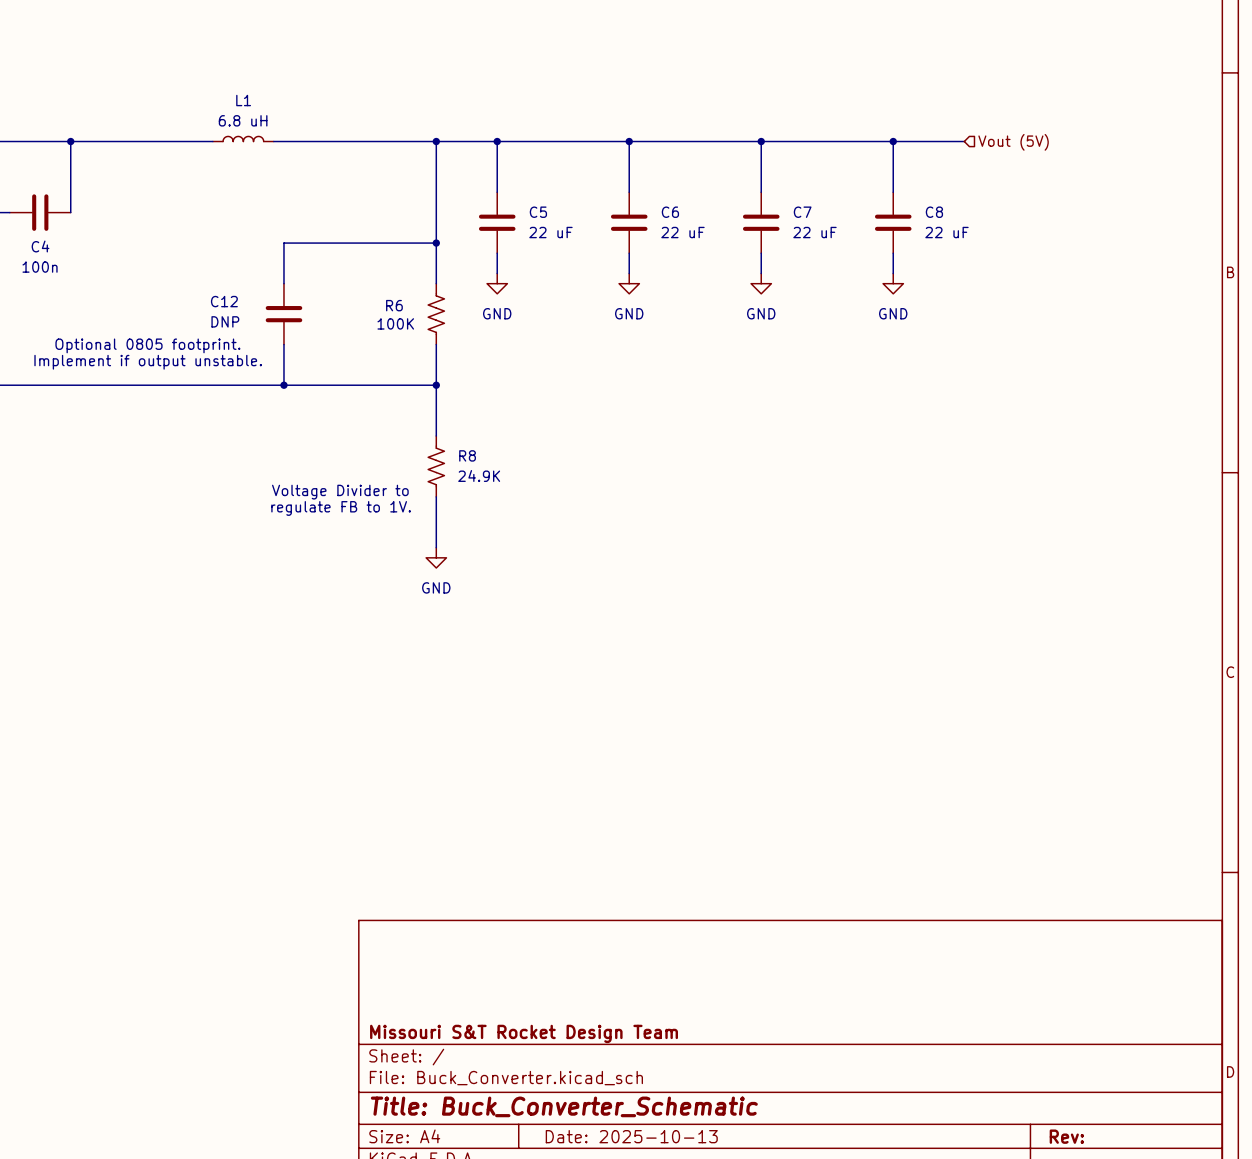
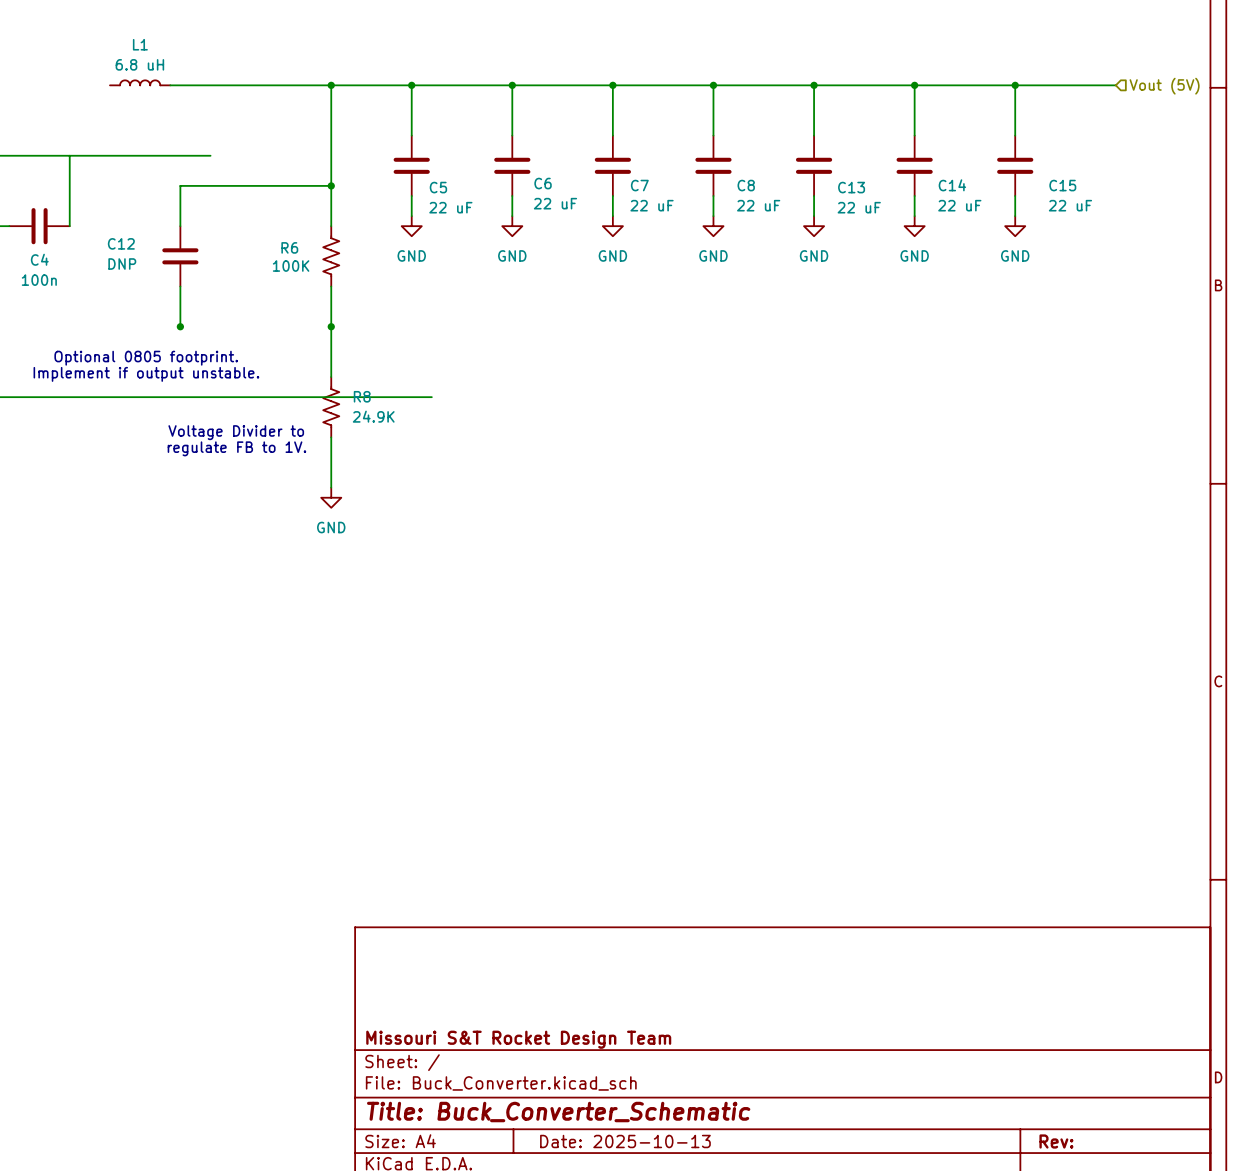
wire: none -> (170, 85) (1115, 85)
junction: none -> (331, 85)
wire: none -> (411, 85) (411, 135)
junction: none -> (411, 85)
junction: none -> (512, 85)
junction: none -> (612, 85)
junction: none -> (713, 85)
wire: none -> (814, 85) (814, 135)
junction: none -> (814, 85)
junction: none -> (914, 85)
wire: none -> (1015, 85) (1015, 135)
junction: none -> (1015, 85)
L1 position: (243, 138) -> (140, 82)
junction: (70, 141) -> none
wire: (273, 141) (964, 141) -> none
wire: (436, 141) (436, 283) -> (331, 85) (331, 226)
junction: (436, 141) -> none
wire: (497, 141) (497, 192) -> (512, 85) (512, 135)
junction: (497, 141) -> none
wire: (629, 141) (629, 192) -> (612, 85) (612, 135)
junction: (629, 141) -> none
wire: (761, 141) (761, 192) -> (713, 85) (713, 135)
junction: (761, 141) -> none
wire: (893, 141) (893, 192) -> (914, 85) (914, 135)
junction: (893, 141) -> none
hierarchical label position: Vout (5V) (1013, 142) -> Vout (5V) (1164, 86)
C13: none -> 22 uF (814, 165)
C14: none -> 22 uF (914, 165)
C15: none -> 22 uF (1015, 165)
junction: none -> (331, 185)
wire: none -> (411, 195) (411, 216)
wire: none -> (814, 195) (814, 216)
wire: none -> (1015, 195) (1015, 216)
power symbol: none -> GND (411, 226)
power symbol: none -> GND (512, 226)
C5 name position: C5 (538, 212) -> C5 (438, 187)
power symbol: none -> GND (612, 226)
C6 name position: C6 (670, 212) -> C6 (543, 183)
power symbol: none -> GND (713, 226)
C7 name position: C7 (802, 212) -> C7 (639, 185)
power symbol: none -> GND (814, 226)
power symbol: none -> GND (914, 226)
C8 name position: C8 (934, 212) -> C8 (746, 185)
power symbol: none -> GND (1015, 226)
C5 position: (497, 222) -> (411, 165)
C6 position: (629, 222) -> (512, 165)
C7 position: (761, 222) -> (612, 165)
C8 position: (893, 222) -> (713, 165)
C5 value position: 22 uF (550, 232) -> 22 uF (450, 207)
C6 value position: 22 uF (682, 232) -> 22 uF (555, 203)
C7 value position: 22 uF (814, 232) -> 22 uF (652, 205)
C8 value position: 22 uF (946, 232) -> 22 uF (758, 205)
wire: (436, 243) (283, 243) (283, 283) -> (331, 185) (180, 185) (180, 226)
junction: (436, 243) -> none
wire: (497, 253) (497, 273) -> (512, 195) (512, 216)
wire: (629, 253) (629, 273) -> (612, 195) (612, 216)
wire: (761, 253) (761, 273) -> (713, 195) (713, 216)
wire: (893, 253) (893, 273) -> (914, 195) (914, 216)
power symbol: GND (497, 283) -> none
power symbol: GND (629, 283) -> none
power symbol: GND (761, 283) -> none
power symbol: GND (893, 283) -> none
junction: none -> (180, 326)
C12 position: (283, 314) -> (180, 256)
junction: none -> (331, 326)
R6 position: (436, 314) -> (331, 256)
wire: (283, 344) (283, 385) -> (180, 286) (180, 326)
wire: (436, 344) (436, 435) -> (331, 286) (331, 377)
junction: (283, 385) -> none
junction: (436, 385) -> none
R8 position: (436, 466) -> (331, 407)
text position: Voltage Divider to (340, 492) -> Voltage Divider to (236, 432)
wire: (436, 496) (436, 547) -> (331, 437) (331, 487)
text position: regulate FB to 1V. (341, 508) -> regulate FB to 1V. (236, 448)
power symbol position: GND (436, 557) -> GND (331, 497)

